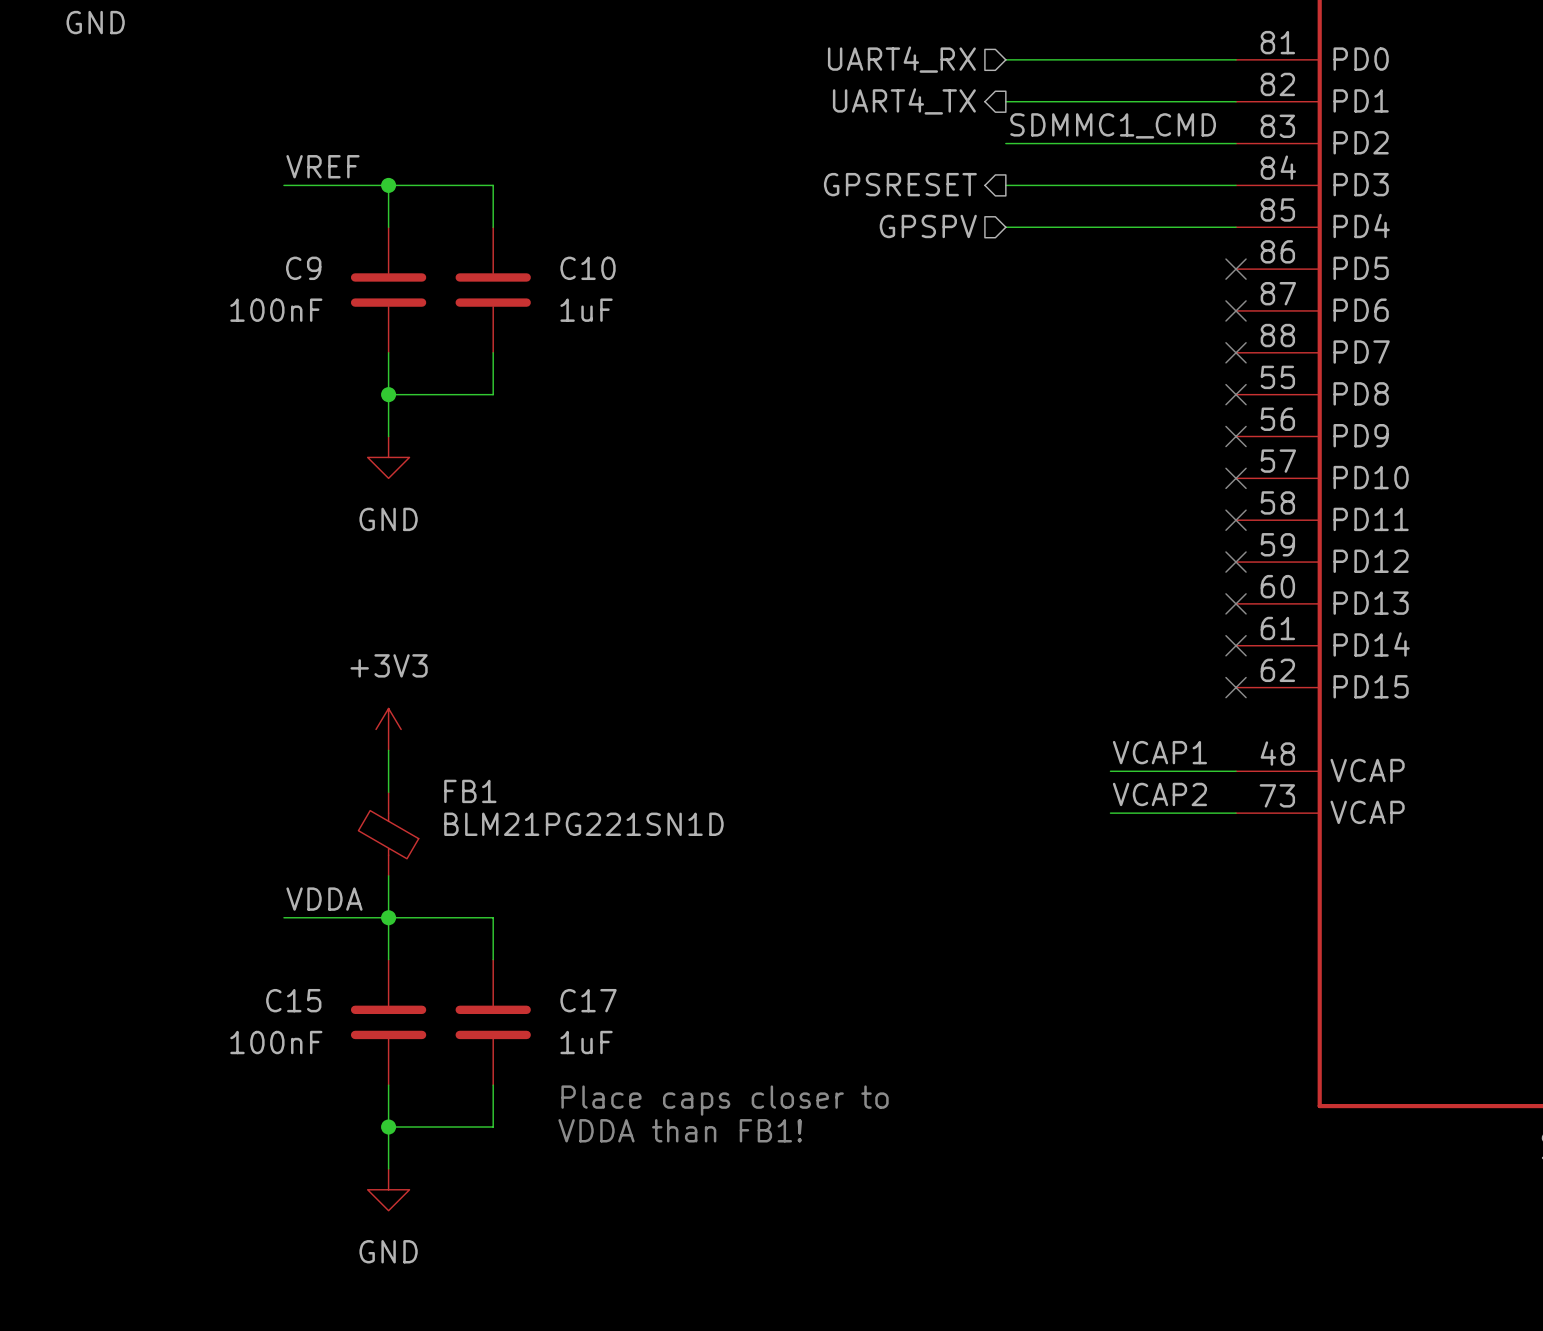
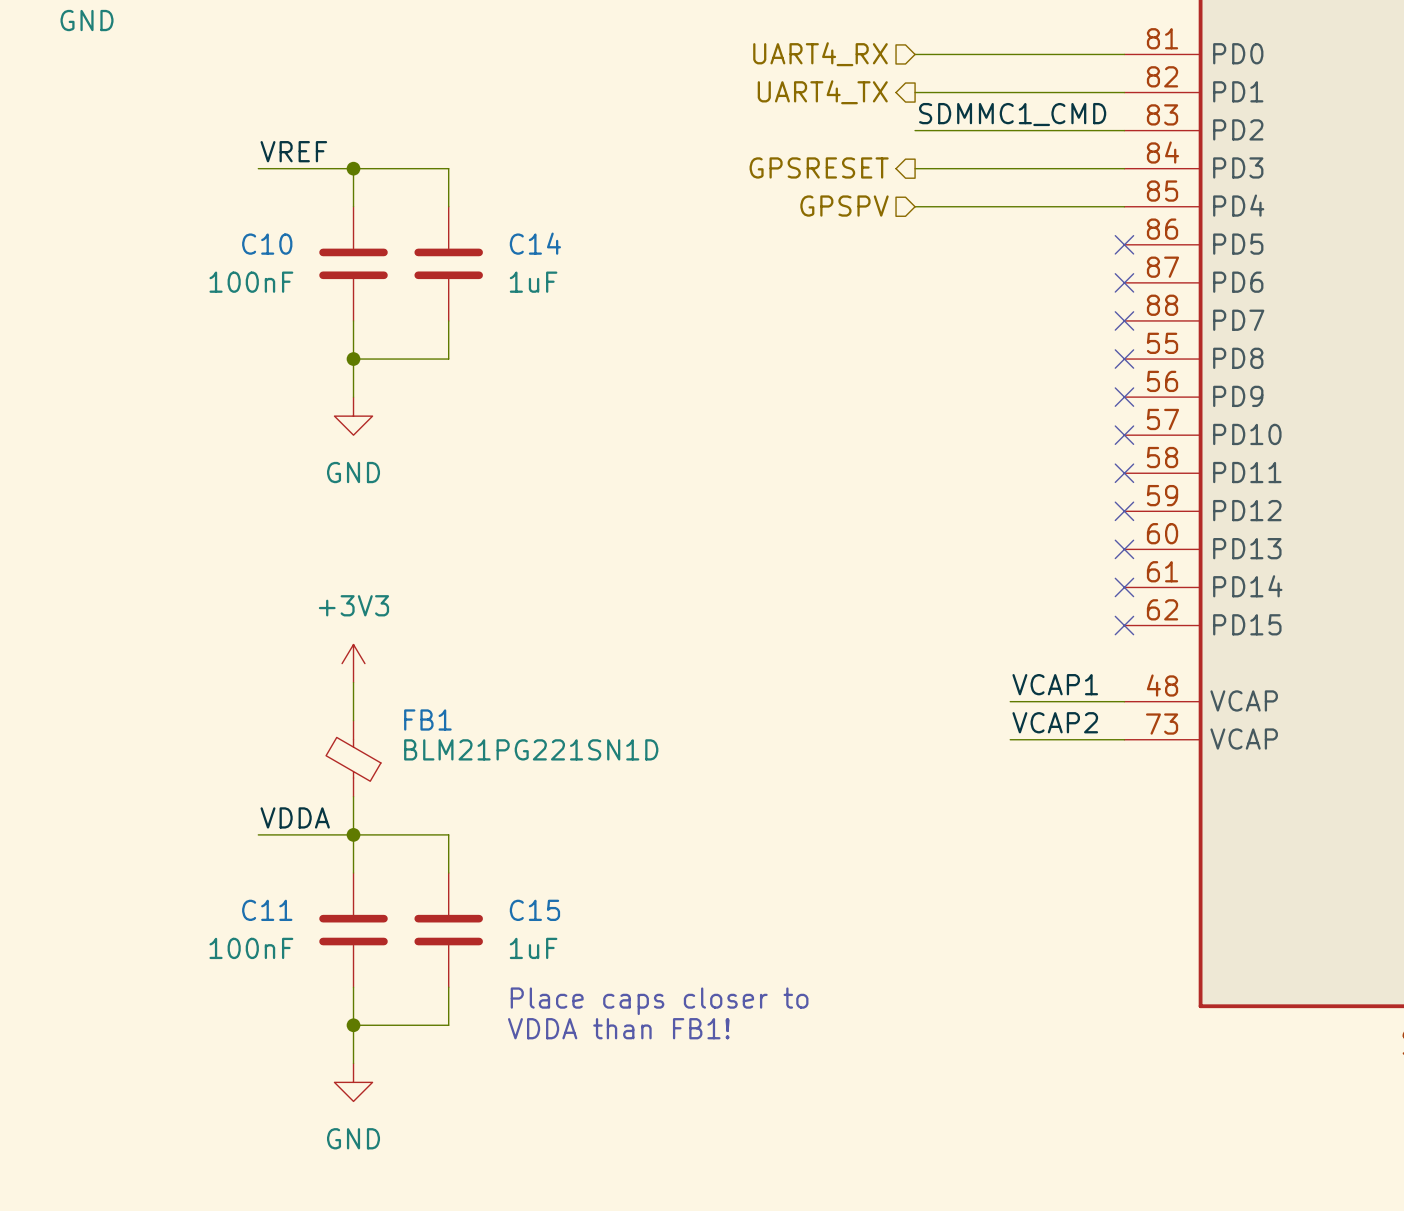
C9 name: C9 (303, 268) -> C10 (267, 244)
C10 name: C10 (588, 268) -> C14 (535, 243)
C15 name: C15 (293, 1000) -> C11 (267, 910)
C17 name: C17 (588, 1000) -> C15 (534, 910)

